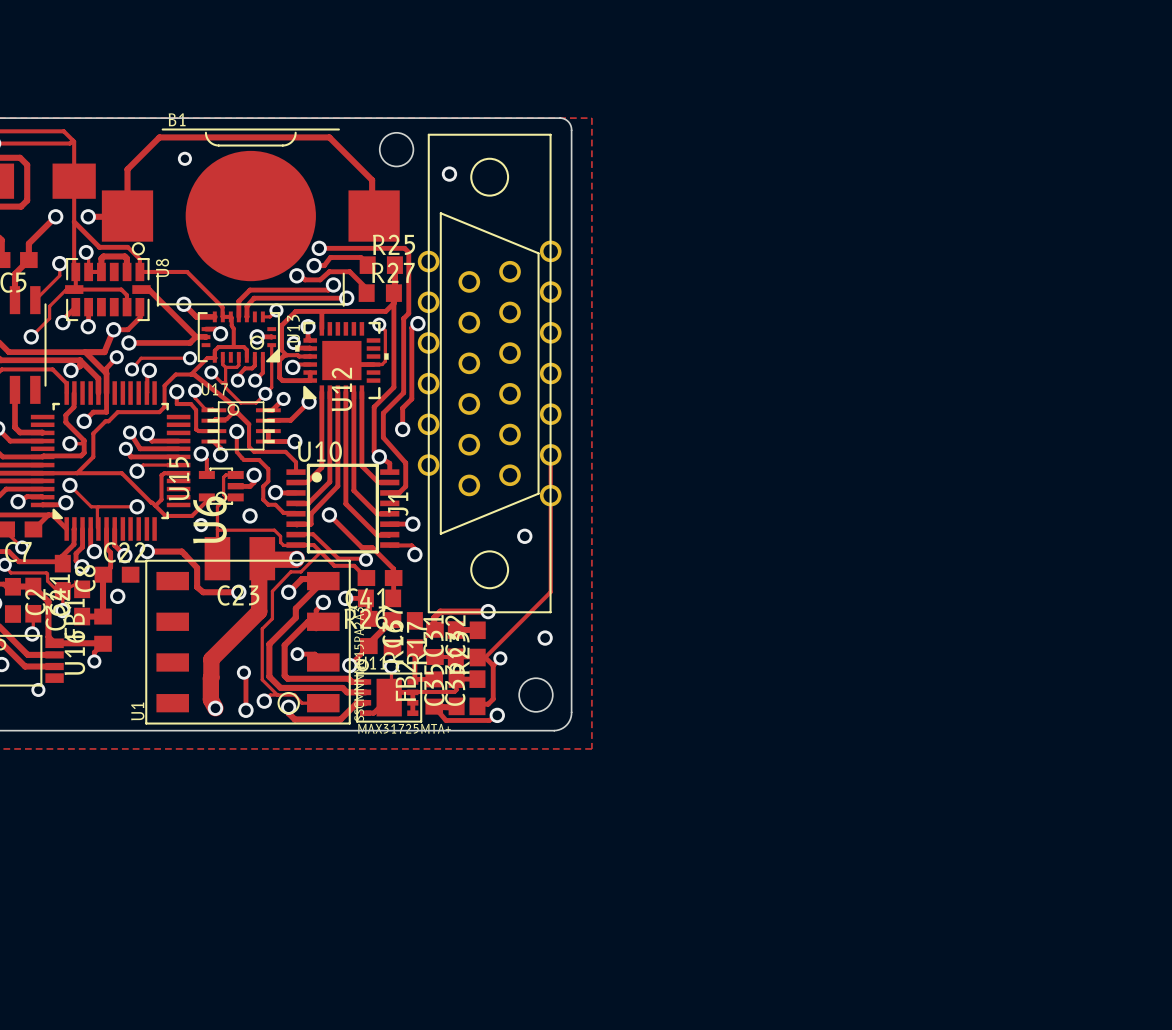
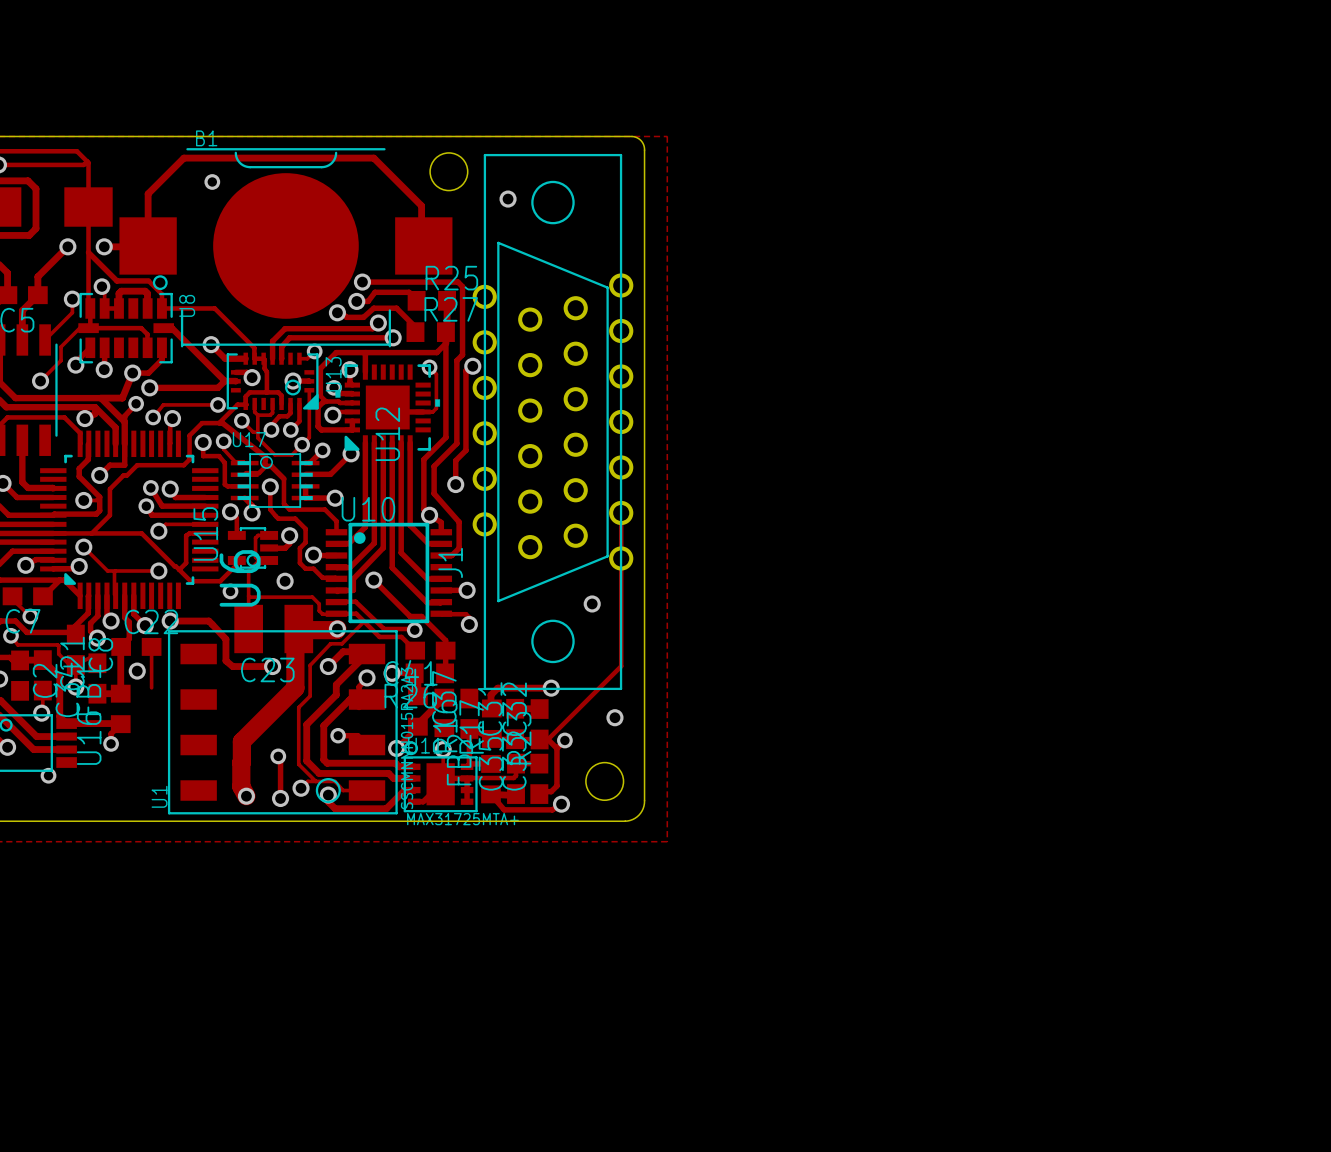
track: none -> (151, 646) (151, 687)

